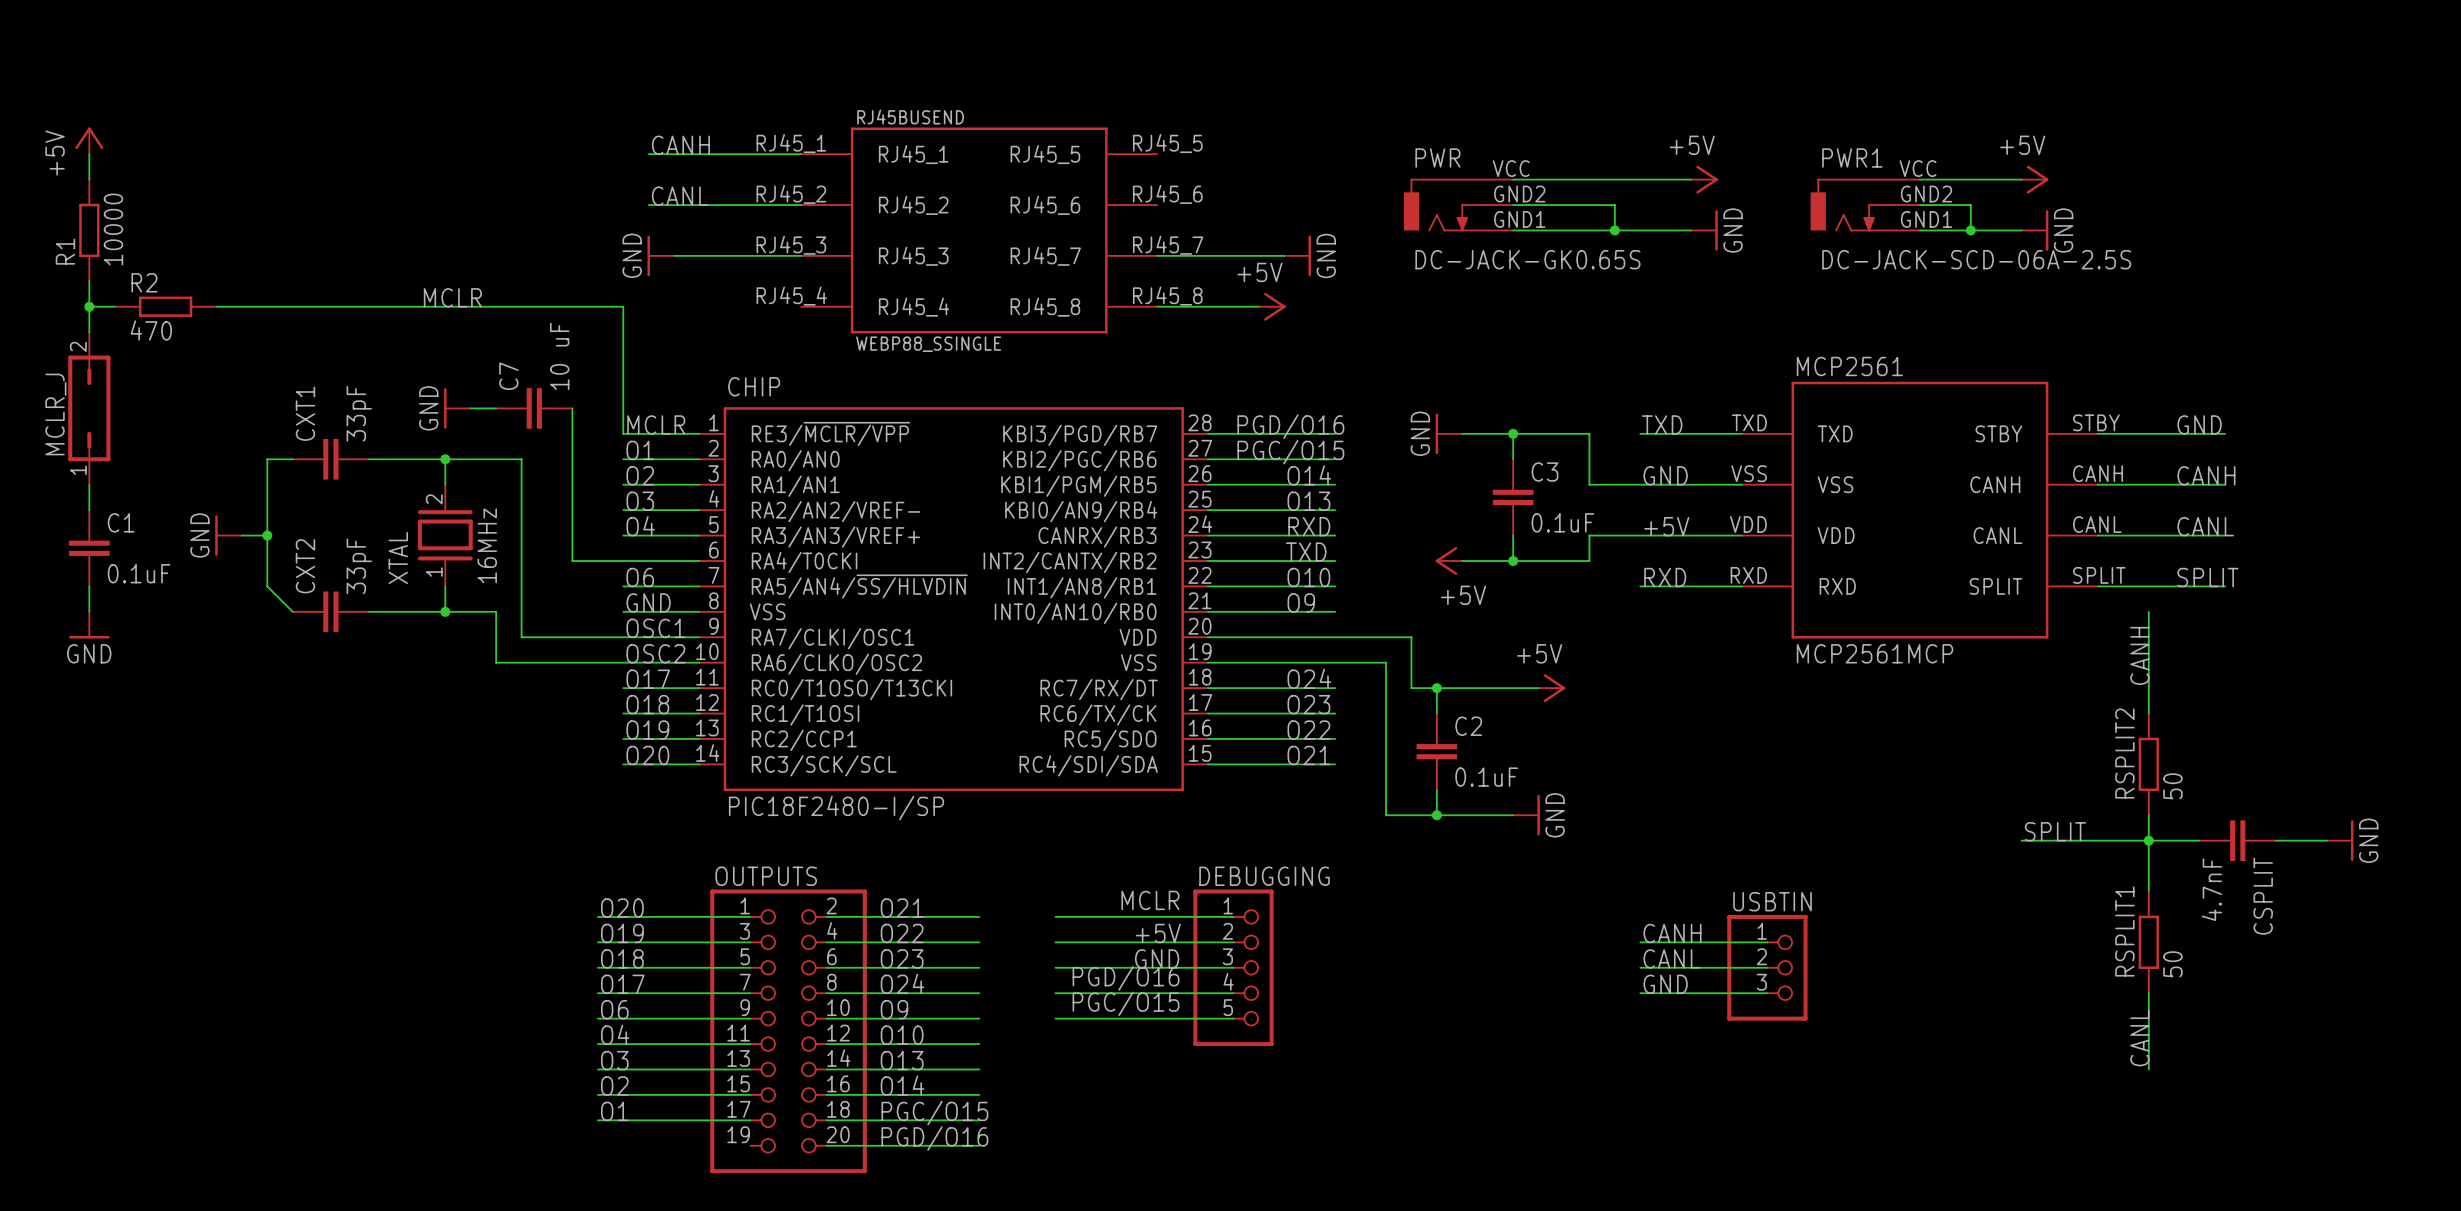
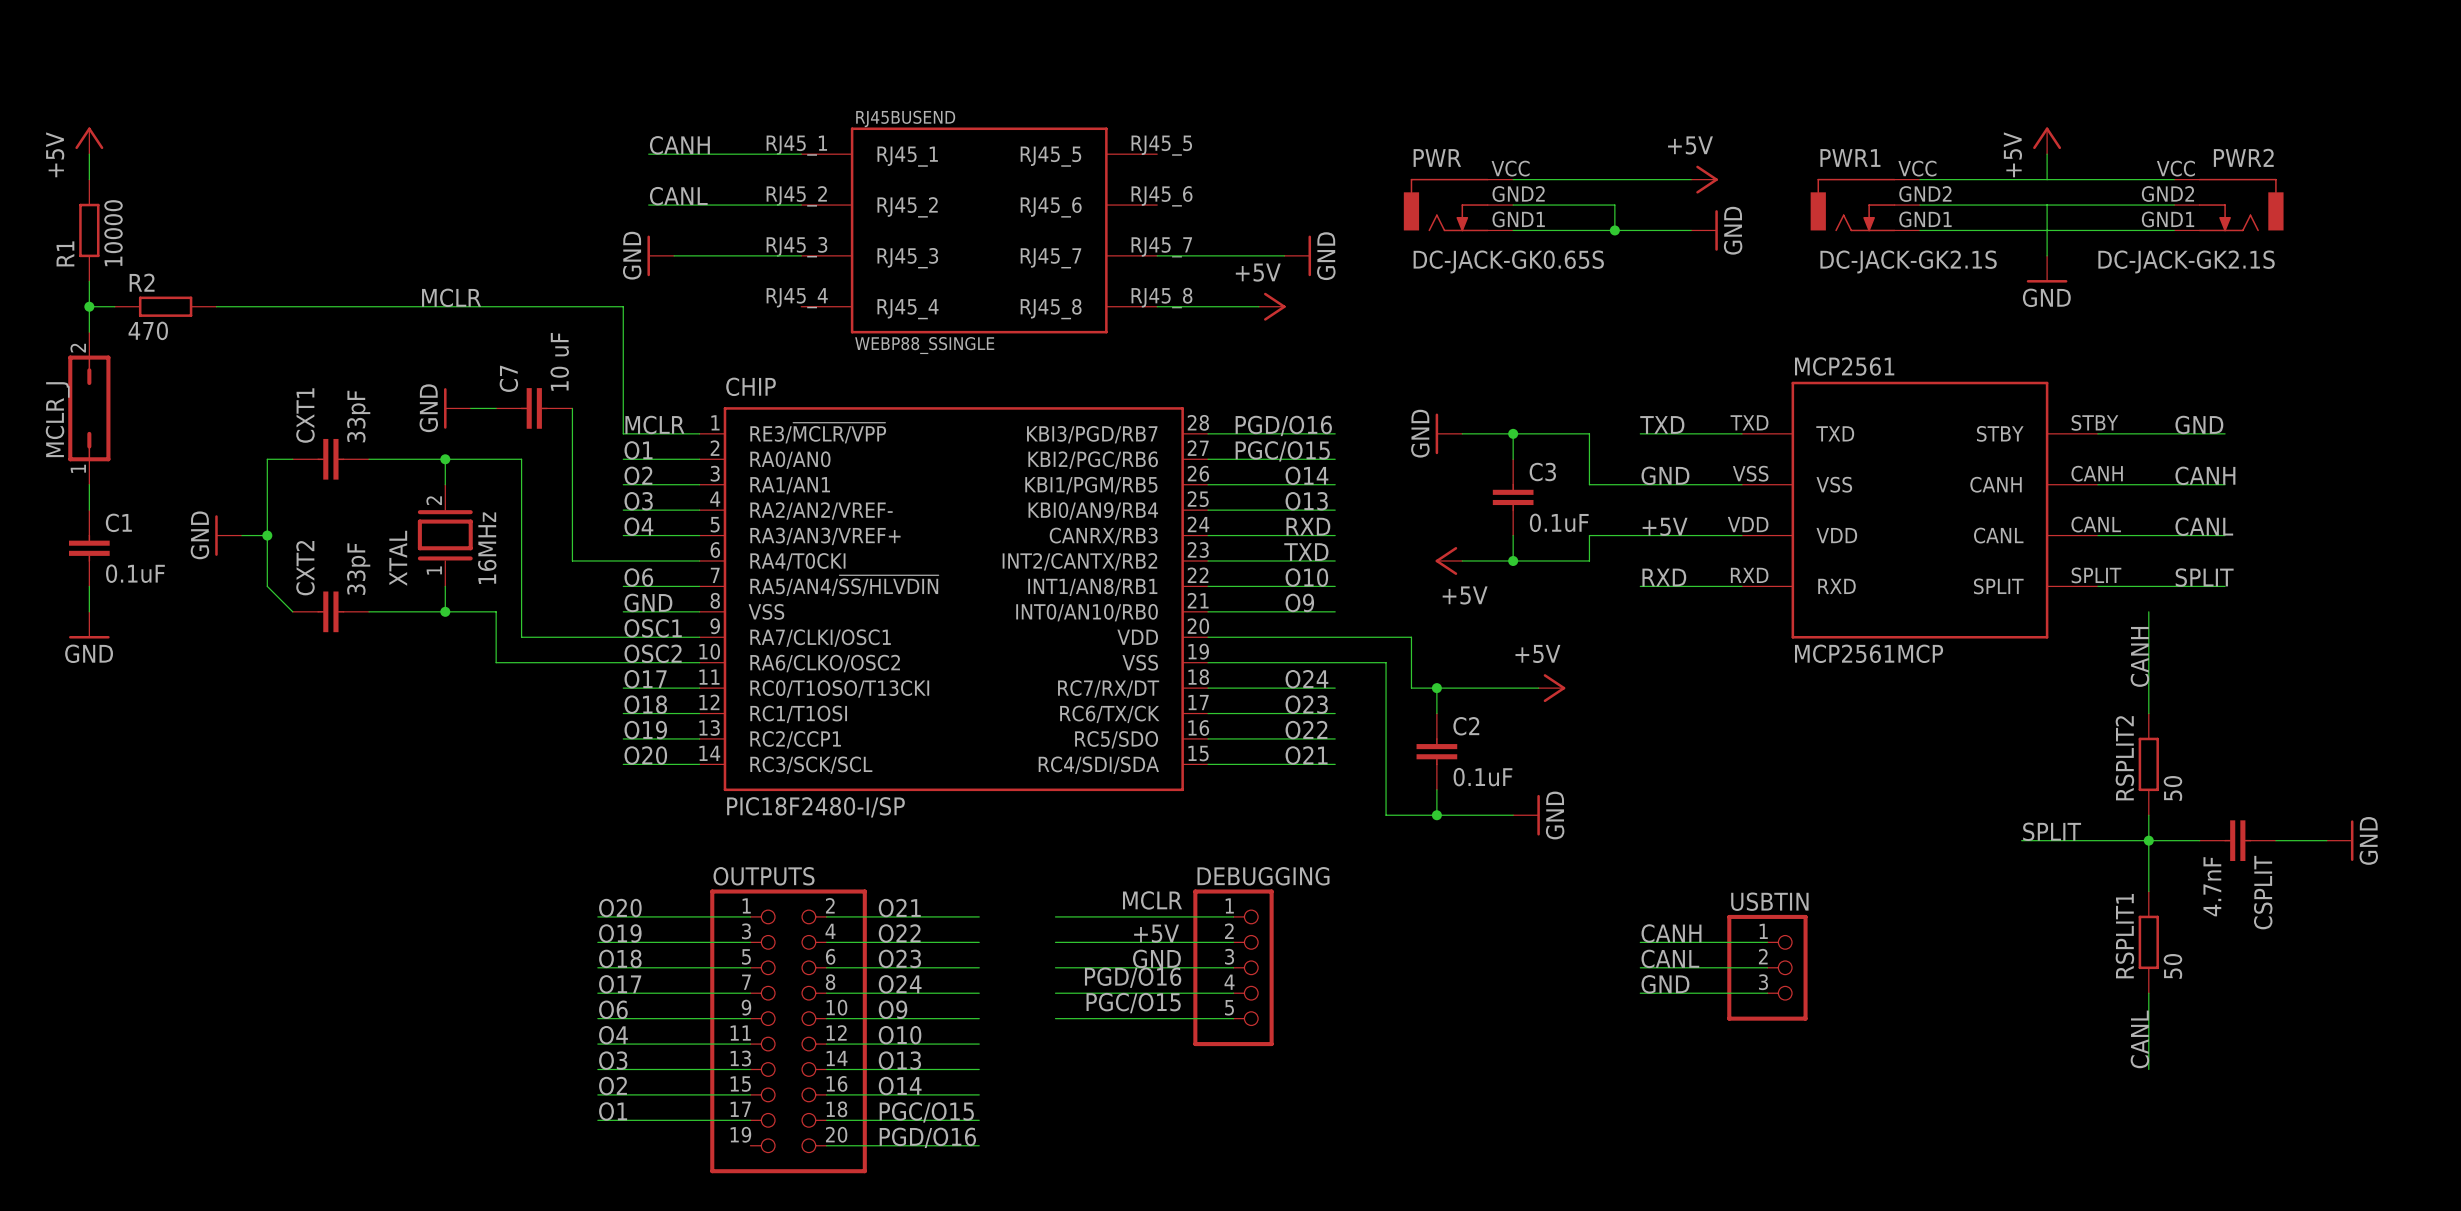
wire: none -> (2047, 154) (2047, 179)
wire: none -> (2021, 179) (2174, 179)
power symbol position: +5V (2035, 179) -> +5V (2047, 140)
power symbol rotation: 0° (2037, 179) -> 90° counterclockwise (2047, 138)
wire: (1970, 205) (1970, 230) -> (1970, 205) (2174, 205)
PWR2: none -> DC-JACK-GK2.1S (2228, 205)
junction: (1970, 230) -> none
wire: none -> (2021, 230) (2174, 230)
power symbol position: GND (2035, 230) -> GND (2047, 269)
power symbol rotation: 0° (2047, 230) -> 90° clockwise (2047, 281)
PWR1 value: DC-JACK-SCD-06A-2.5S (1976, 259) -> DC-JACK-GK2.1S (1908, 261)

